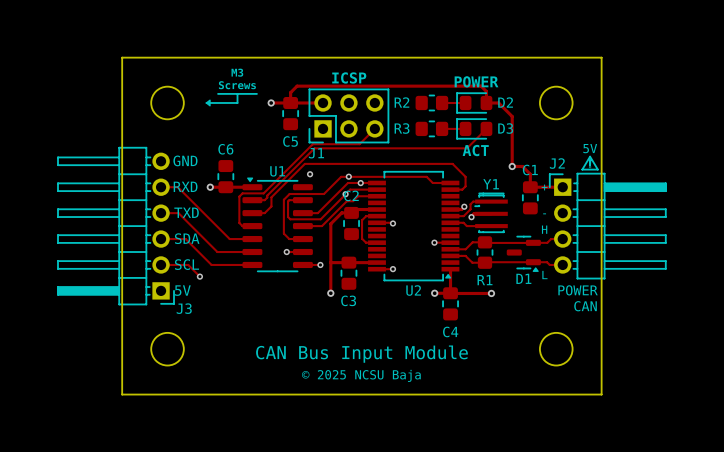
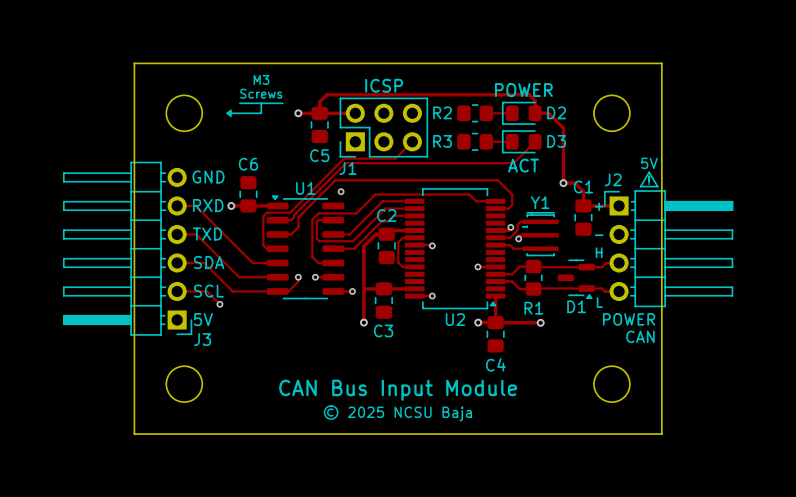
via: (348, 176) -> none
via: (360, 183) -> none
via: (345, 194) -> none
track: none -> (298, 277) (298, 281) (288, 291) (277, 291)
via: none -> (298, 277)

